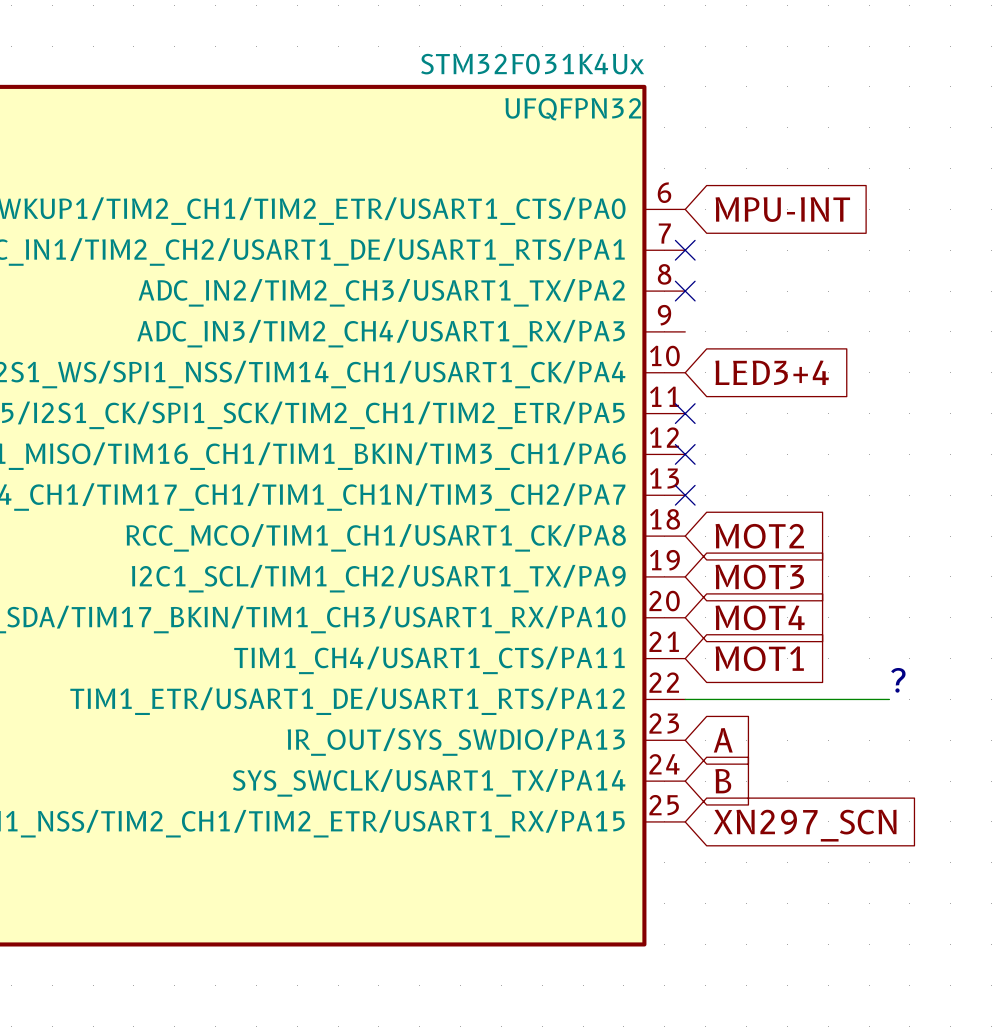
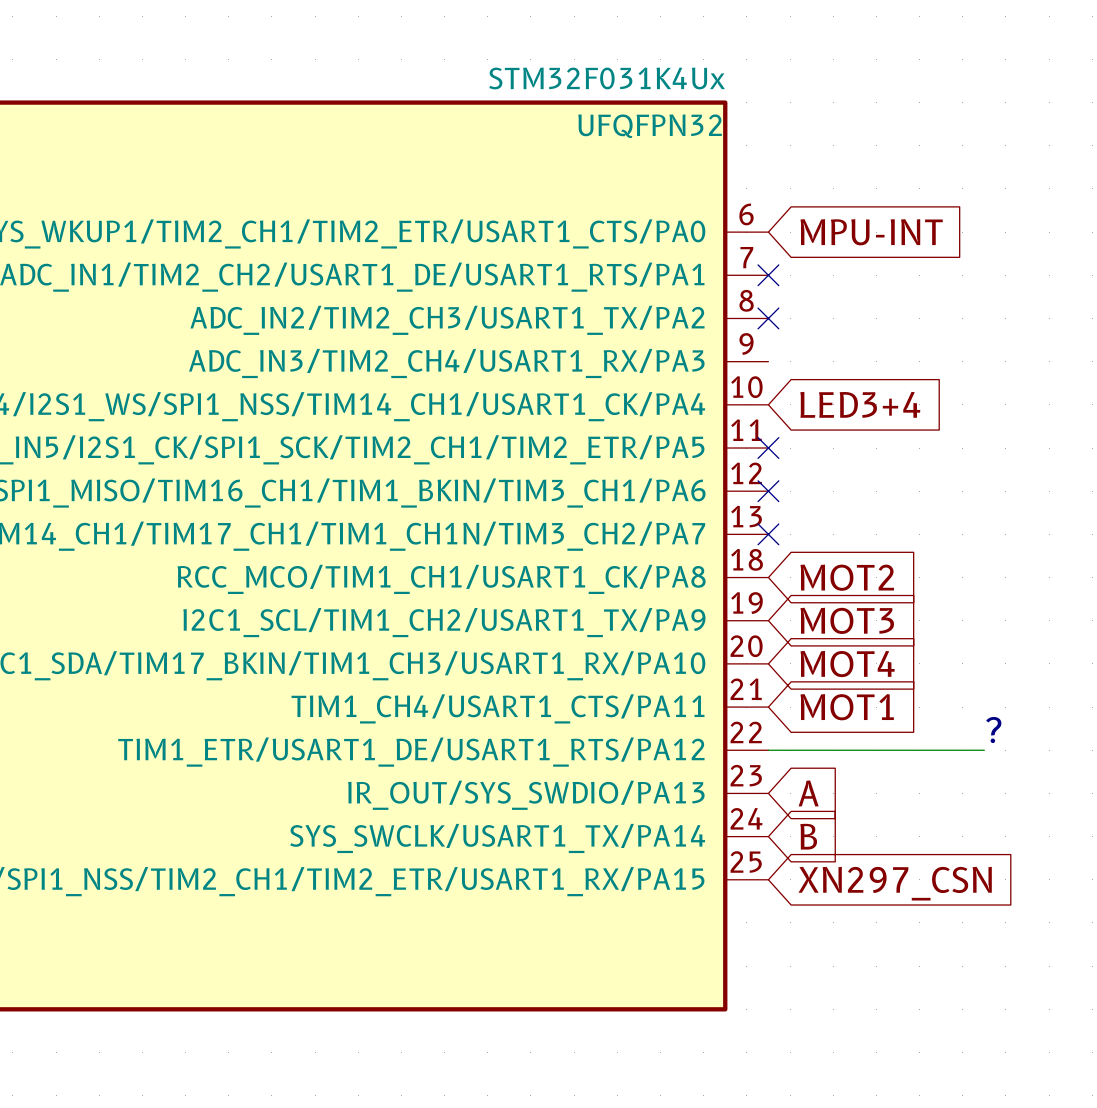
global label: XN297_SCN (805, 825) -> XN297_CSN (895, 883)

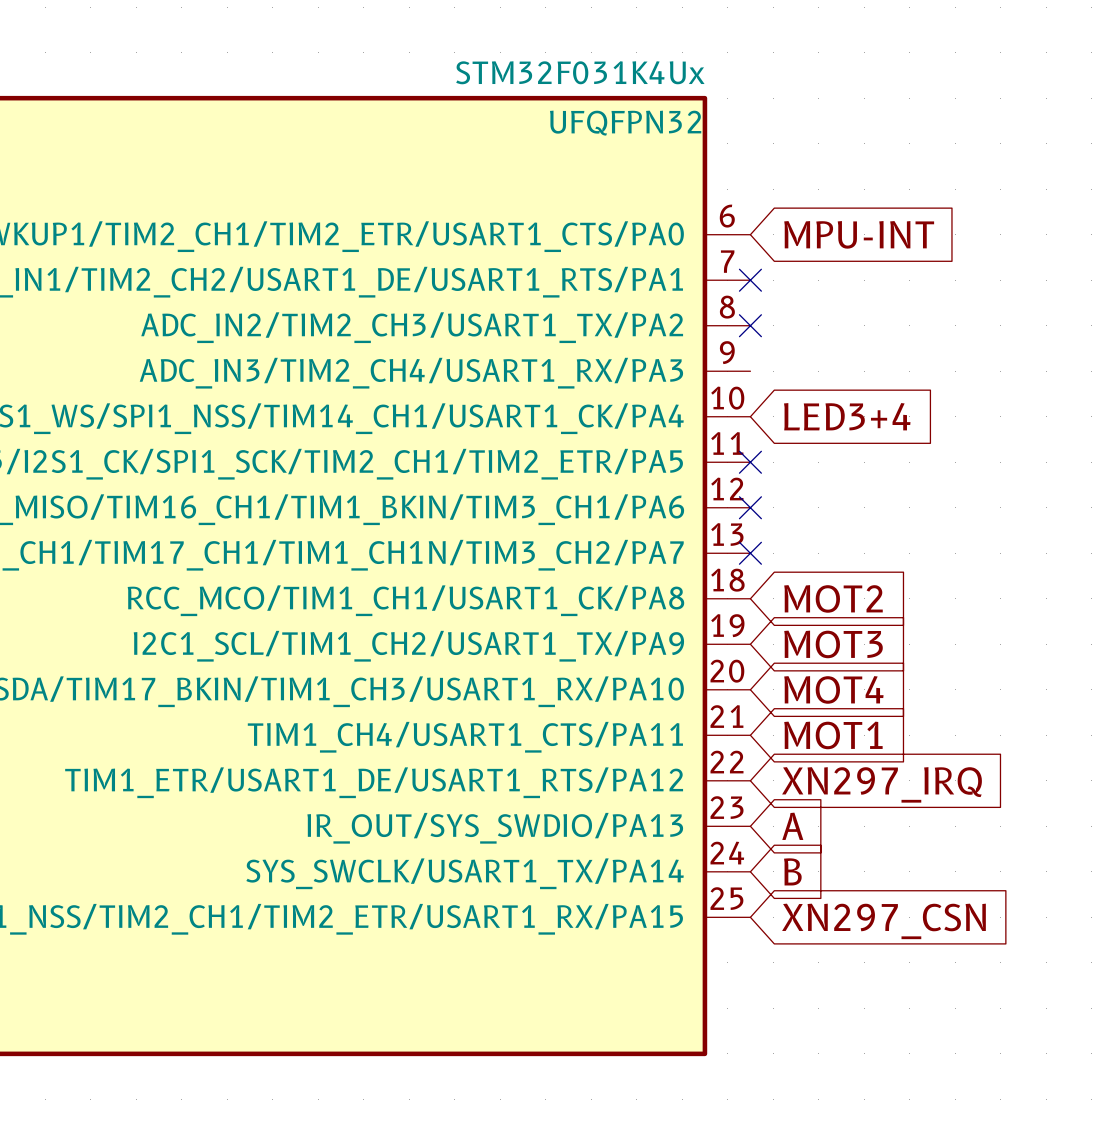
text: ? (993, 730) -> none
wire: (768, 750) (984, 750) -> none
global label: none -> XN297_IRQ (882, 784)

